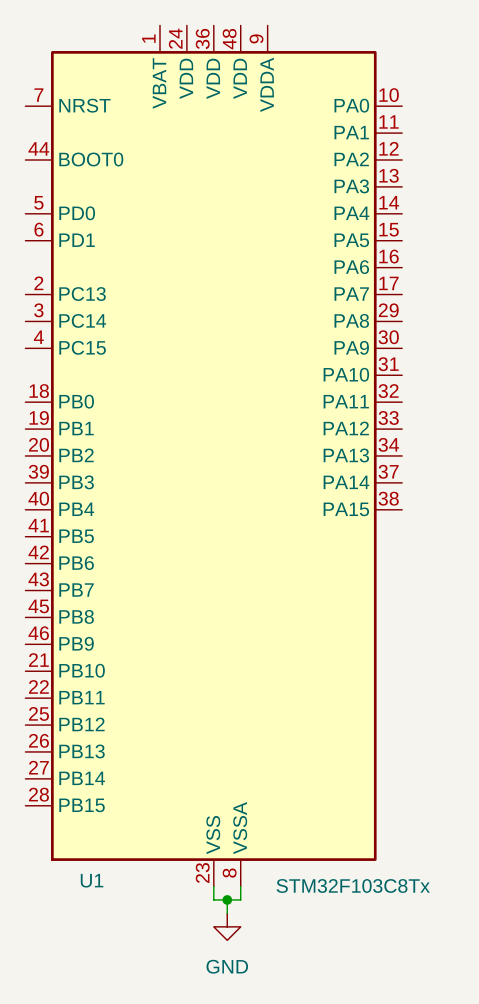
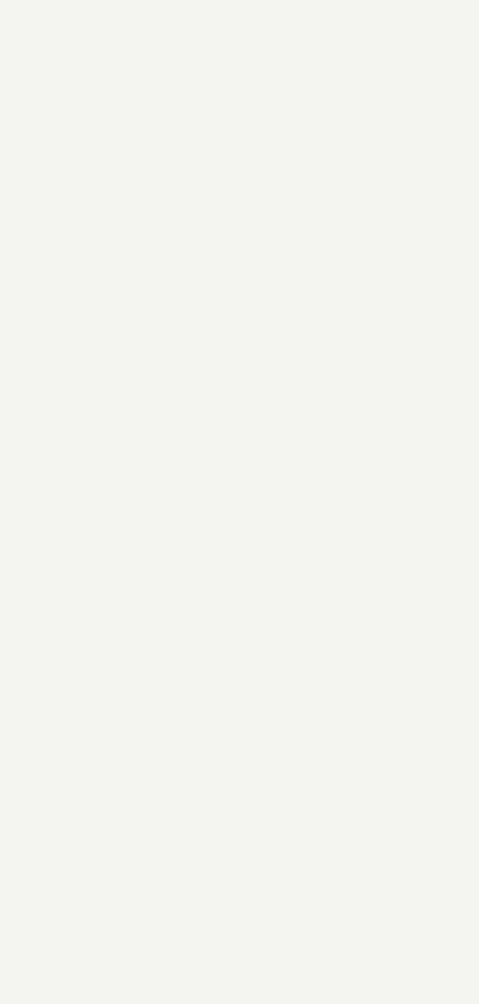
U1: STM32F103C8Tx (213, 455) -> none
wire: (213, 886) (213, 899) (240, 899) (240, 886) -> none
wire: (227, 899) (227, 913) -> none
junction: (227, 899) -> none
power symbol: GND (227, 926) -> none

